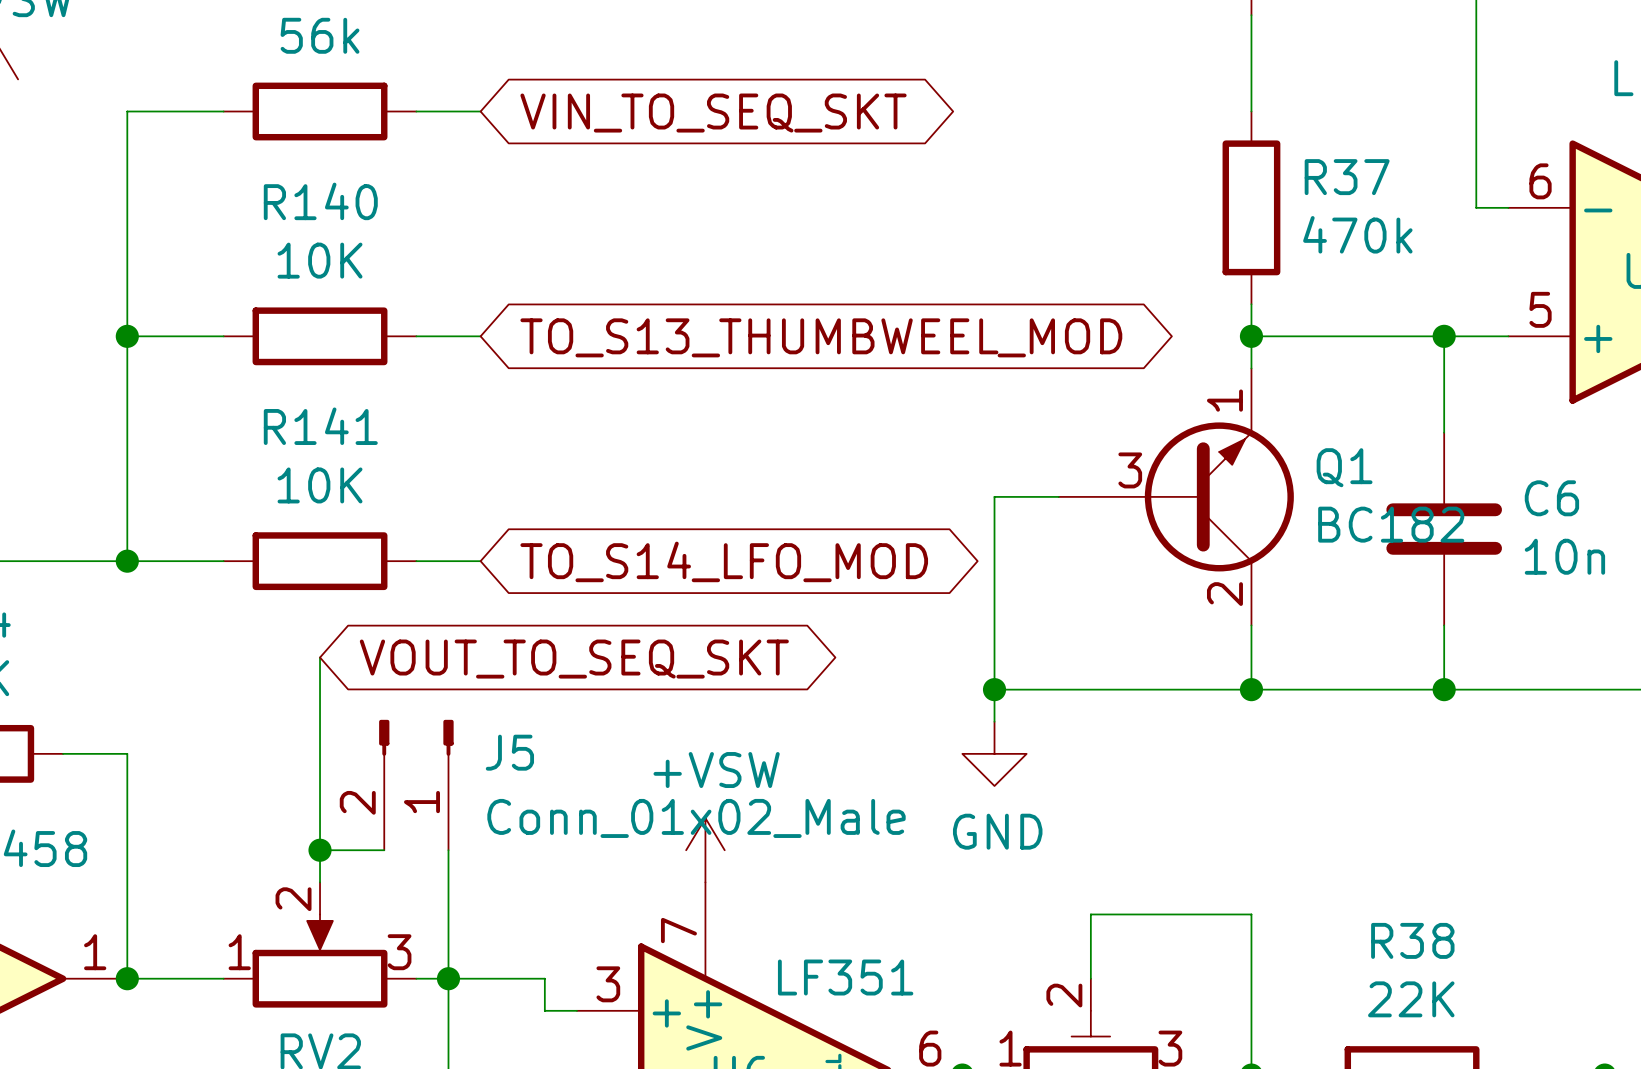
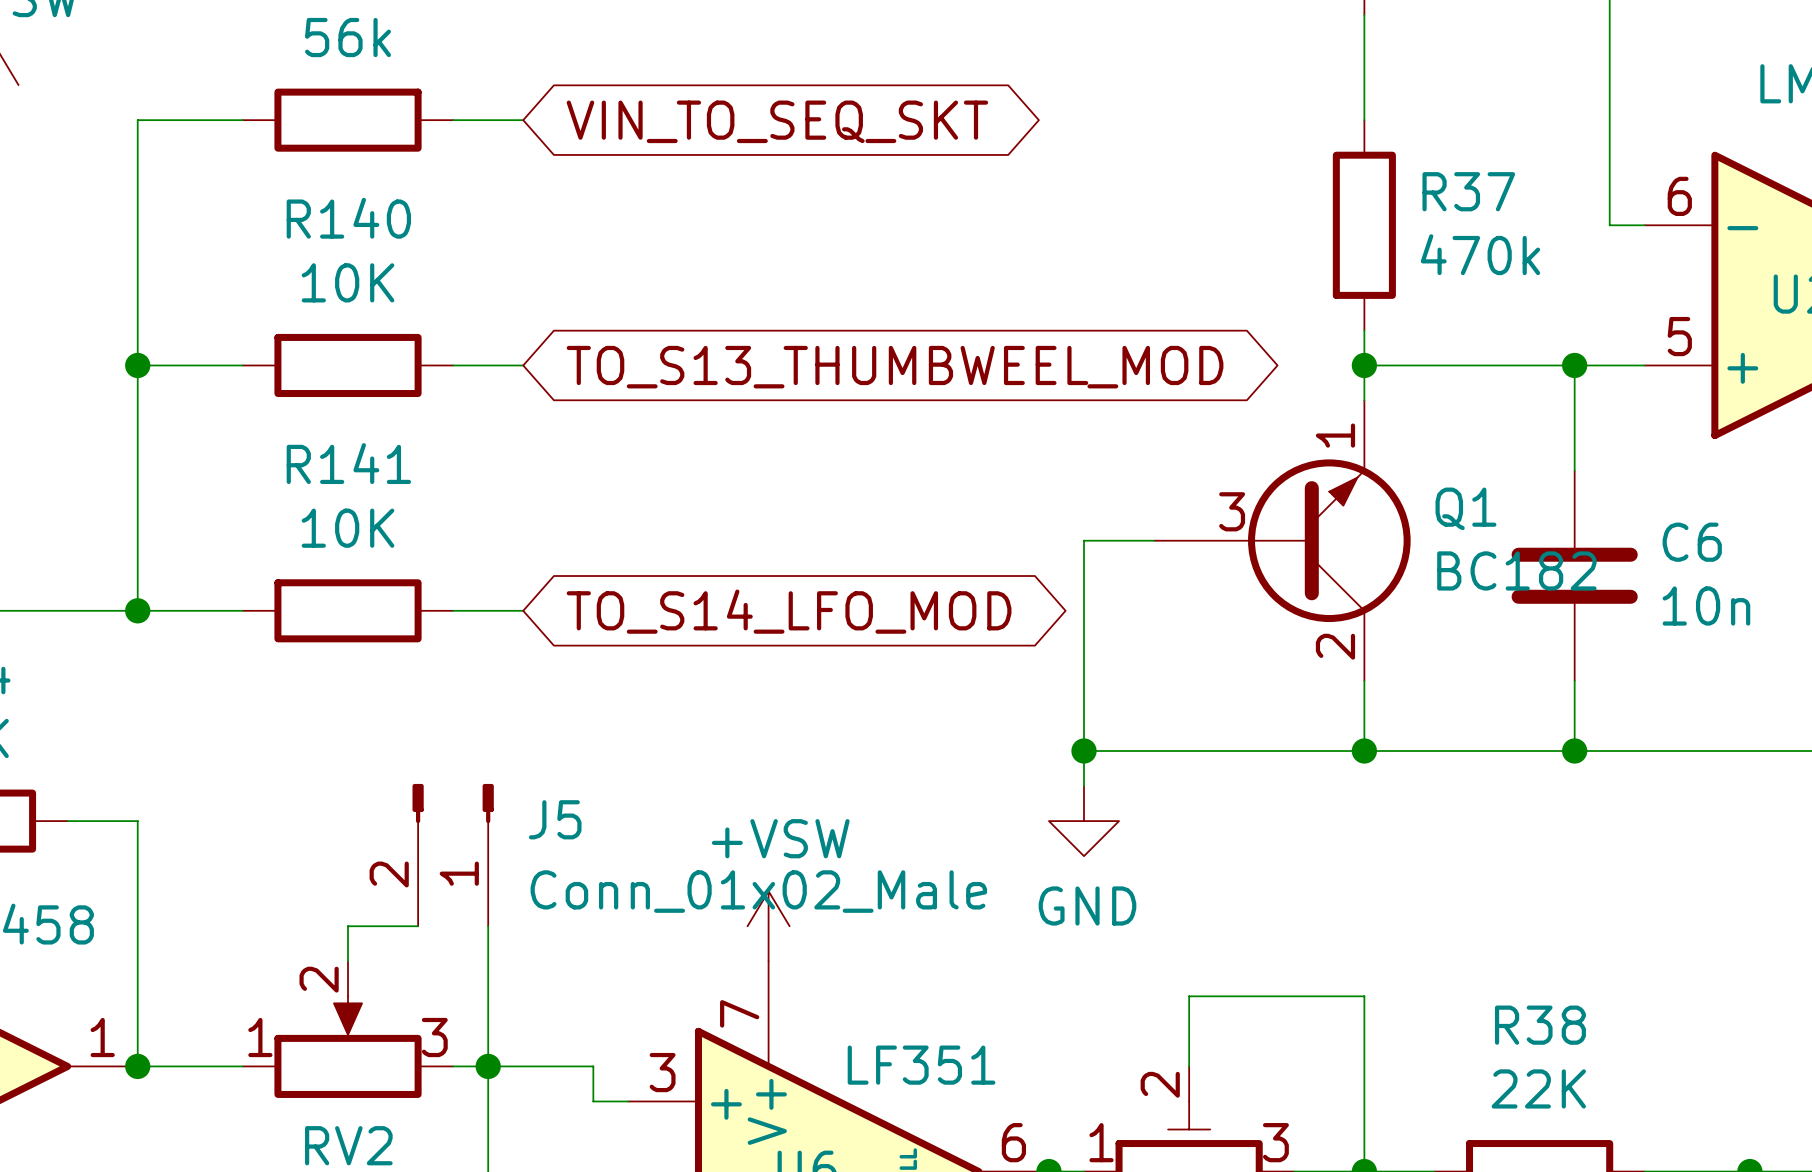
wire: (320, 657) (320, 850) -> none
global label: VOUT_TO_SEQ_SKT (574, 659) -> none
junction: (320, 850) -> none

